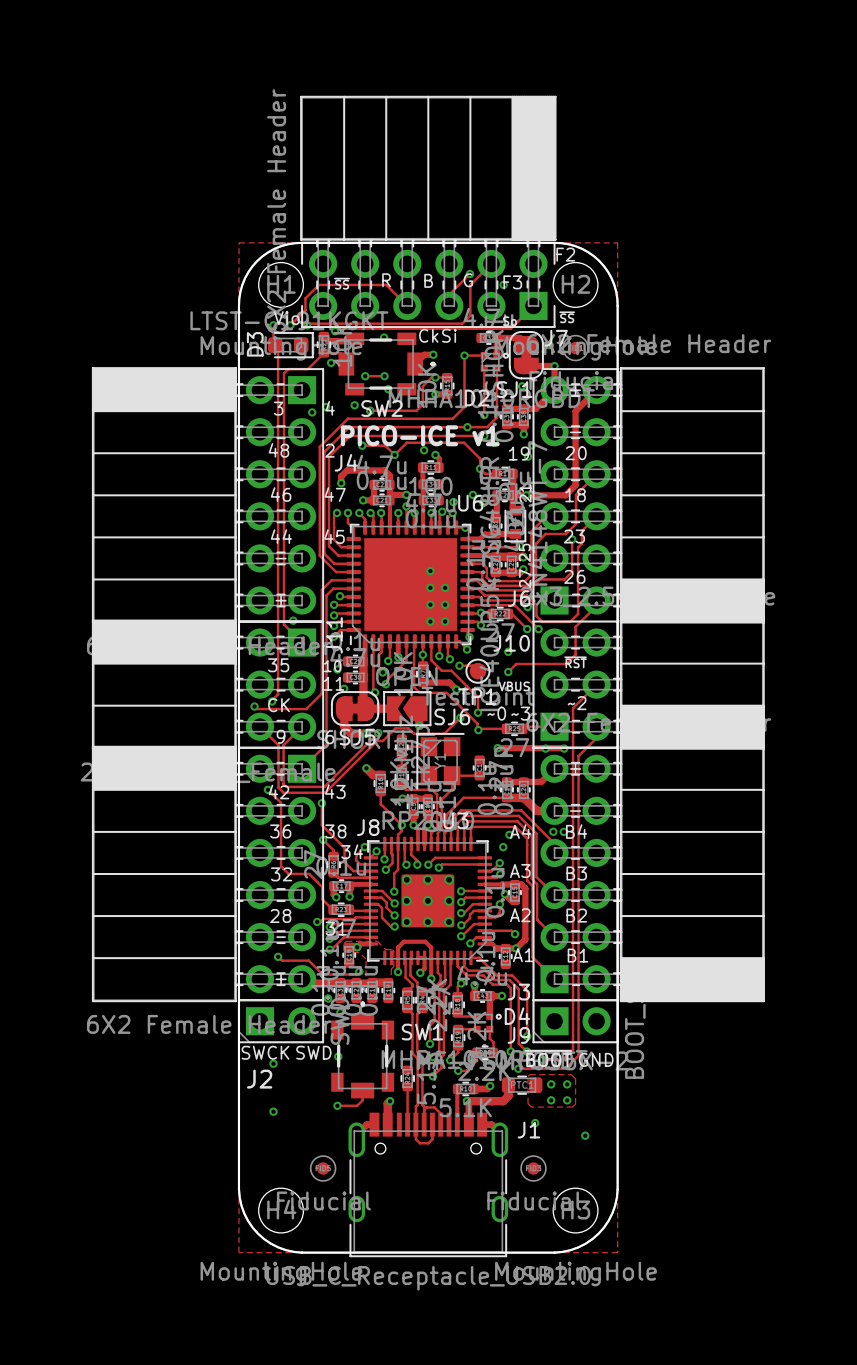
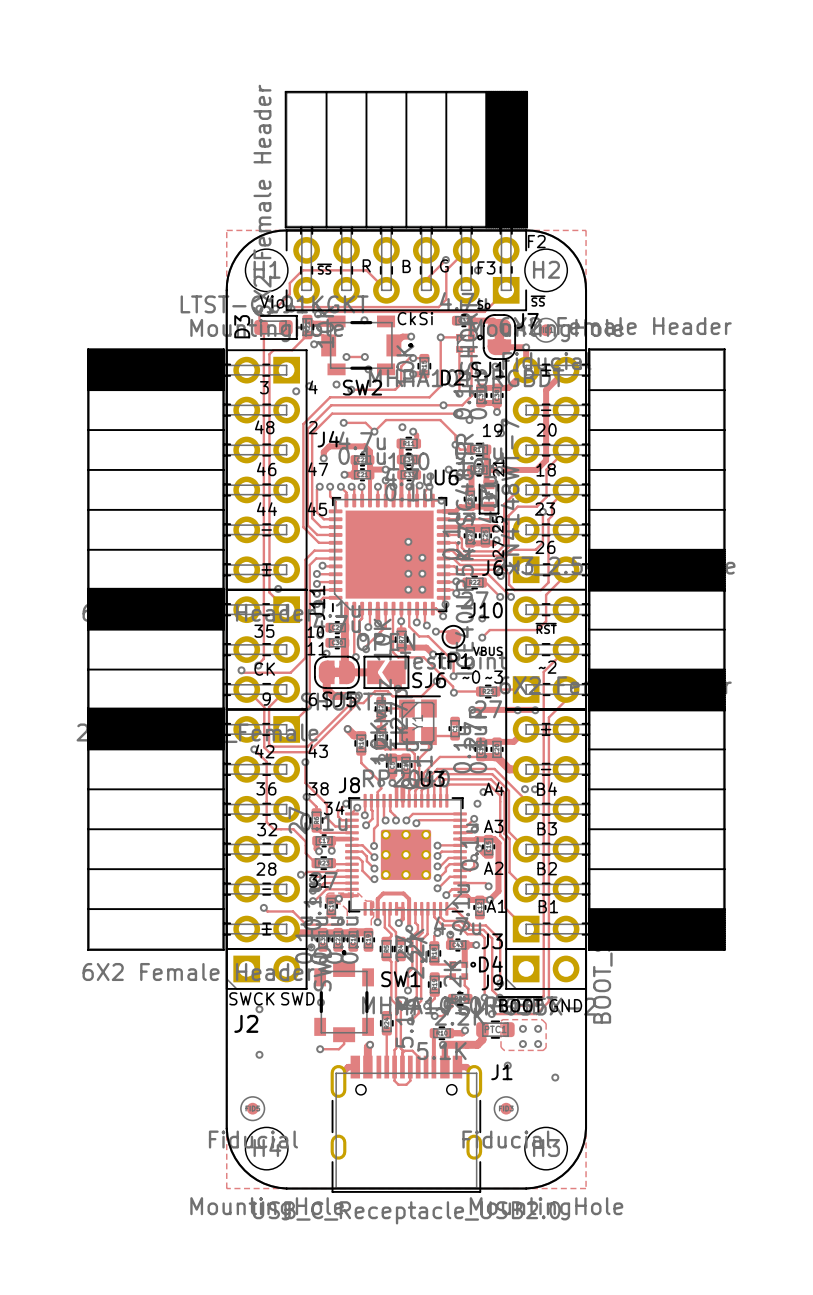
text: PICO-ICE v1 (420, 435) -> none
part position: (323, 1168) -> (252, 1108)

